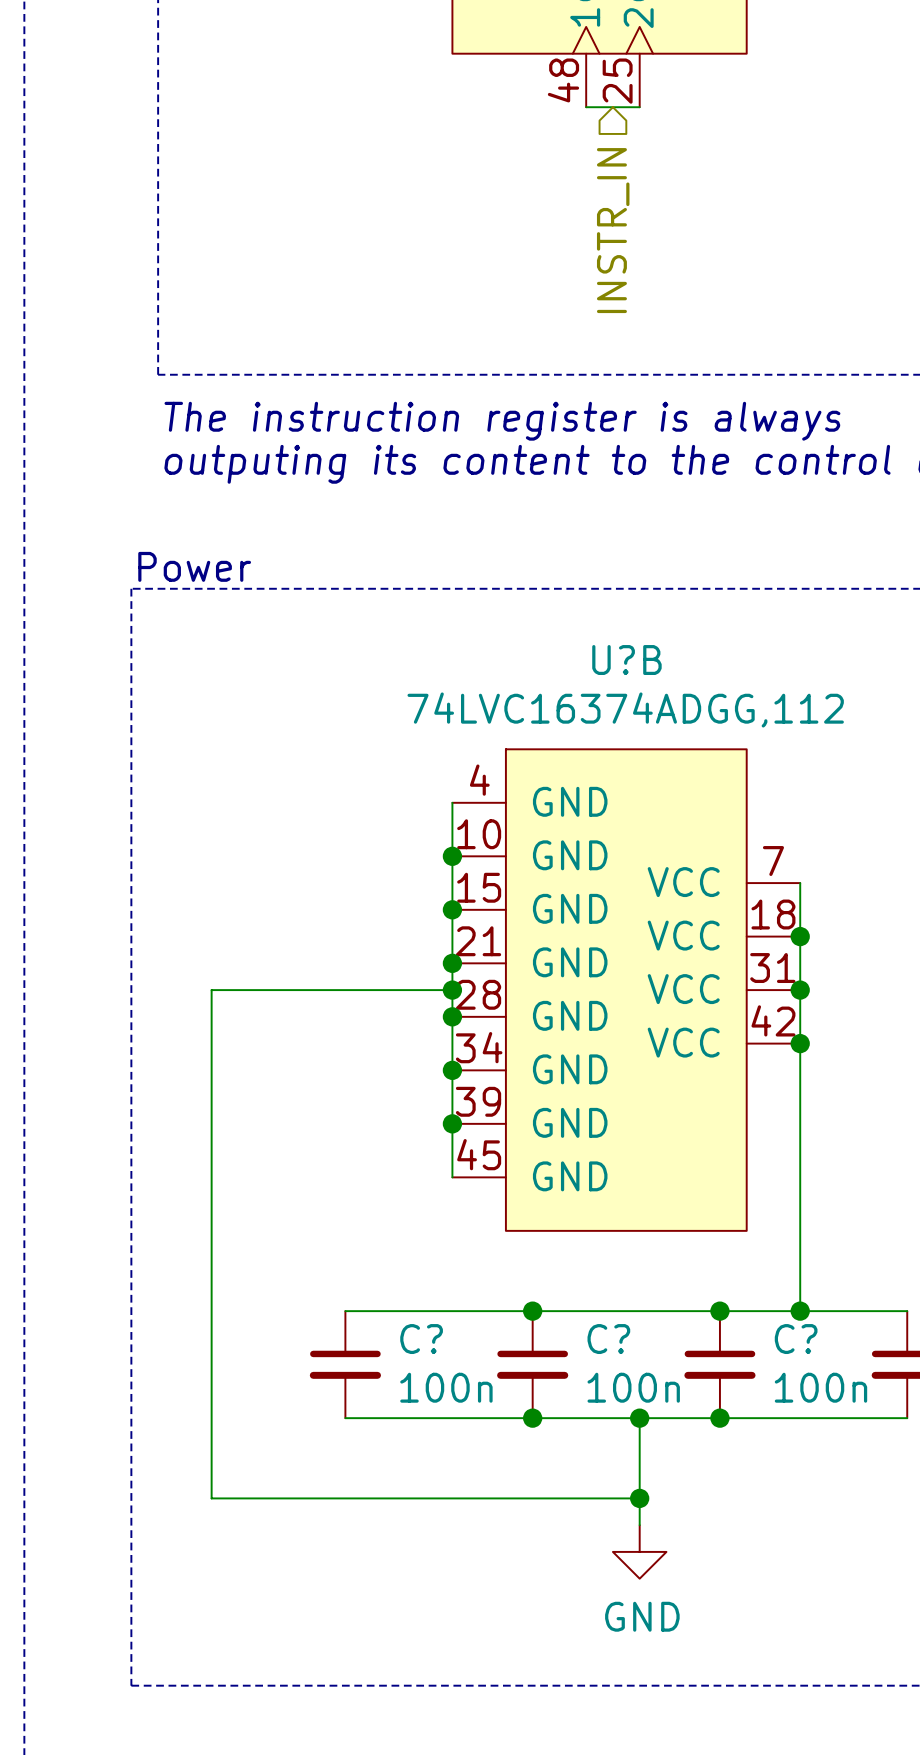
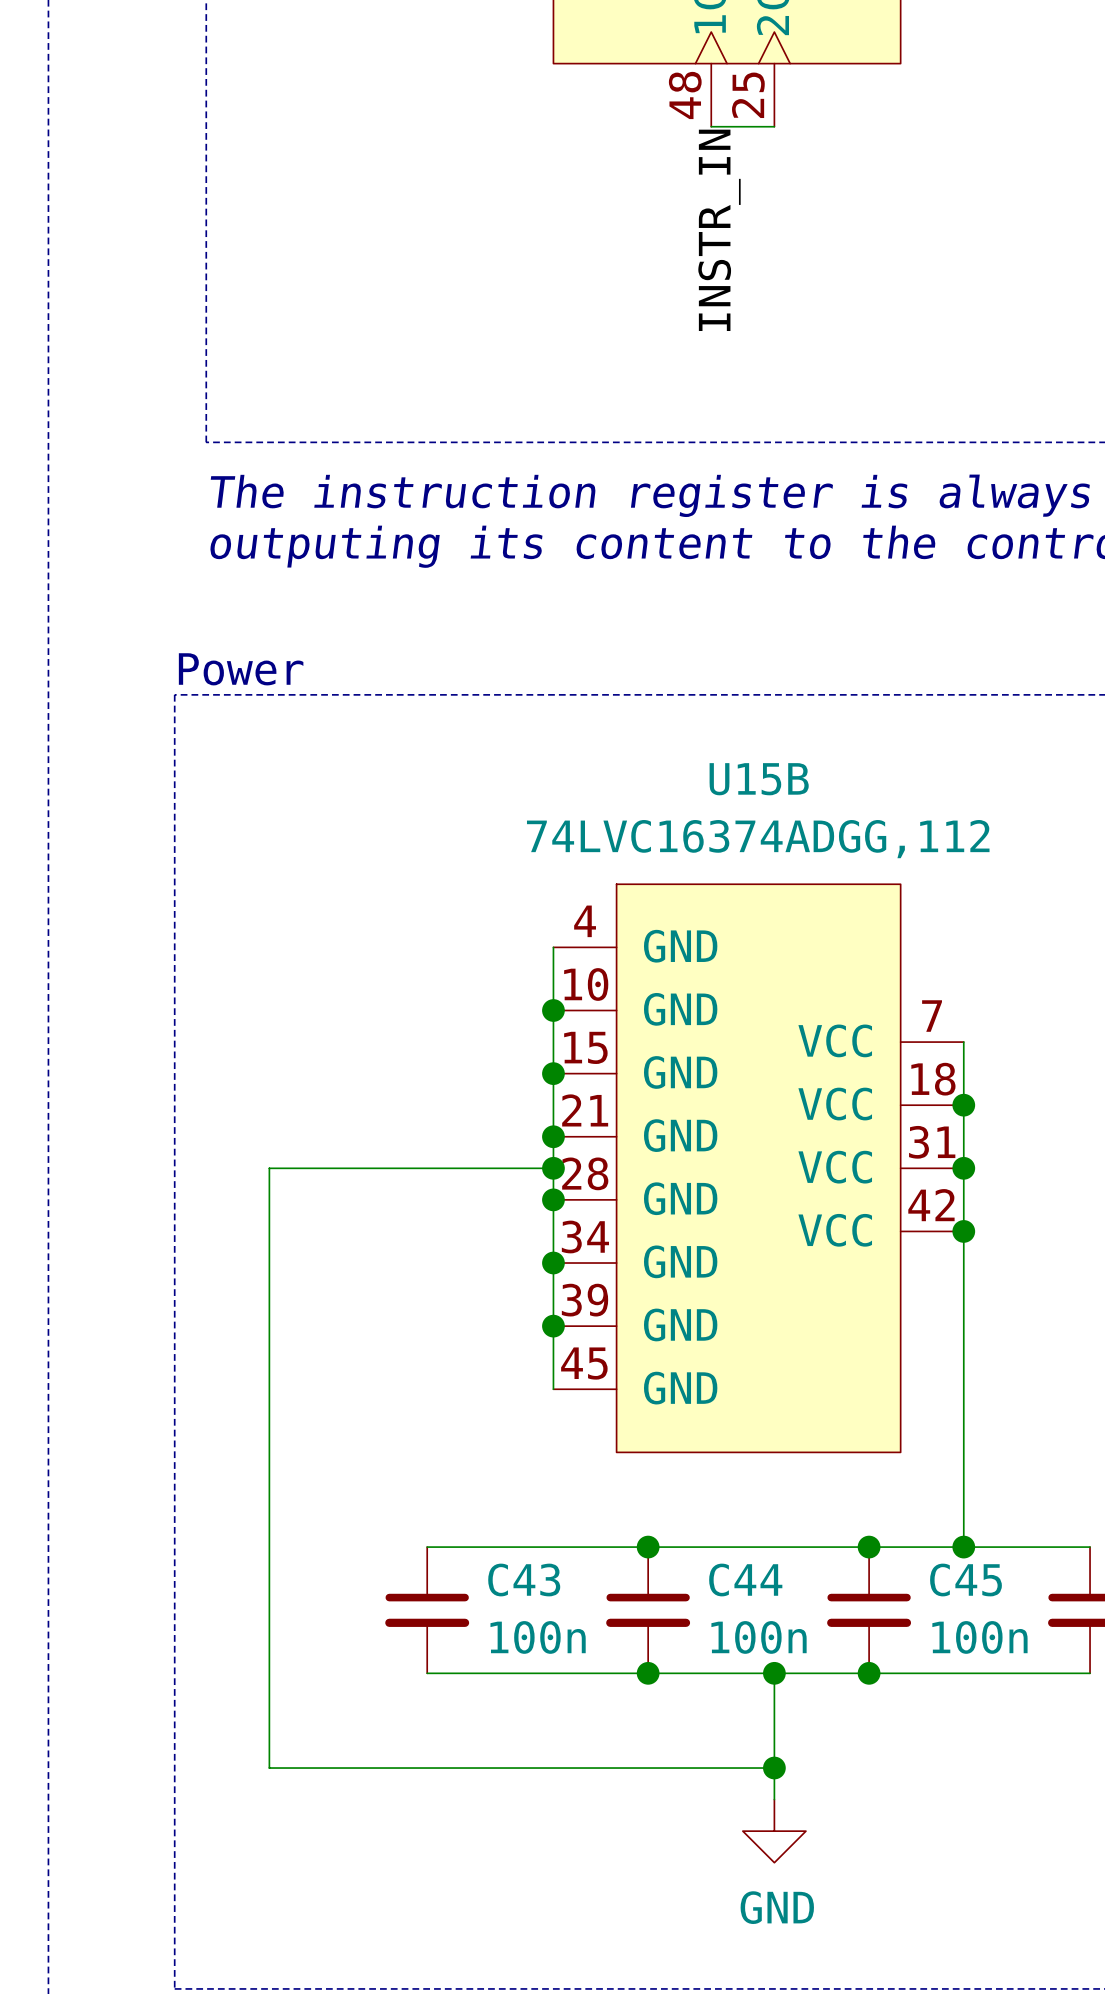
label: none -> INSTR_IN (719, 230)
hierarchical label: INSTR_IN (613, 230) -> none
U?B name: U?B (626, 660) -> U15B (759, 779)
C? name: C? (421, 1339) -> C43 (524, 1580)
C? name: C? (608, 1339) -> C44 (745, 1580)
C? name: C? (796, 1339) -> C45 (965, 1580)

